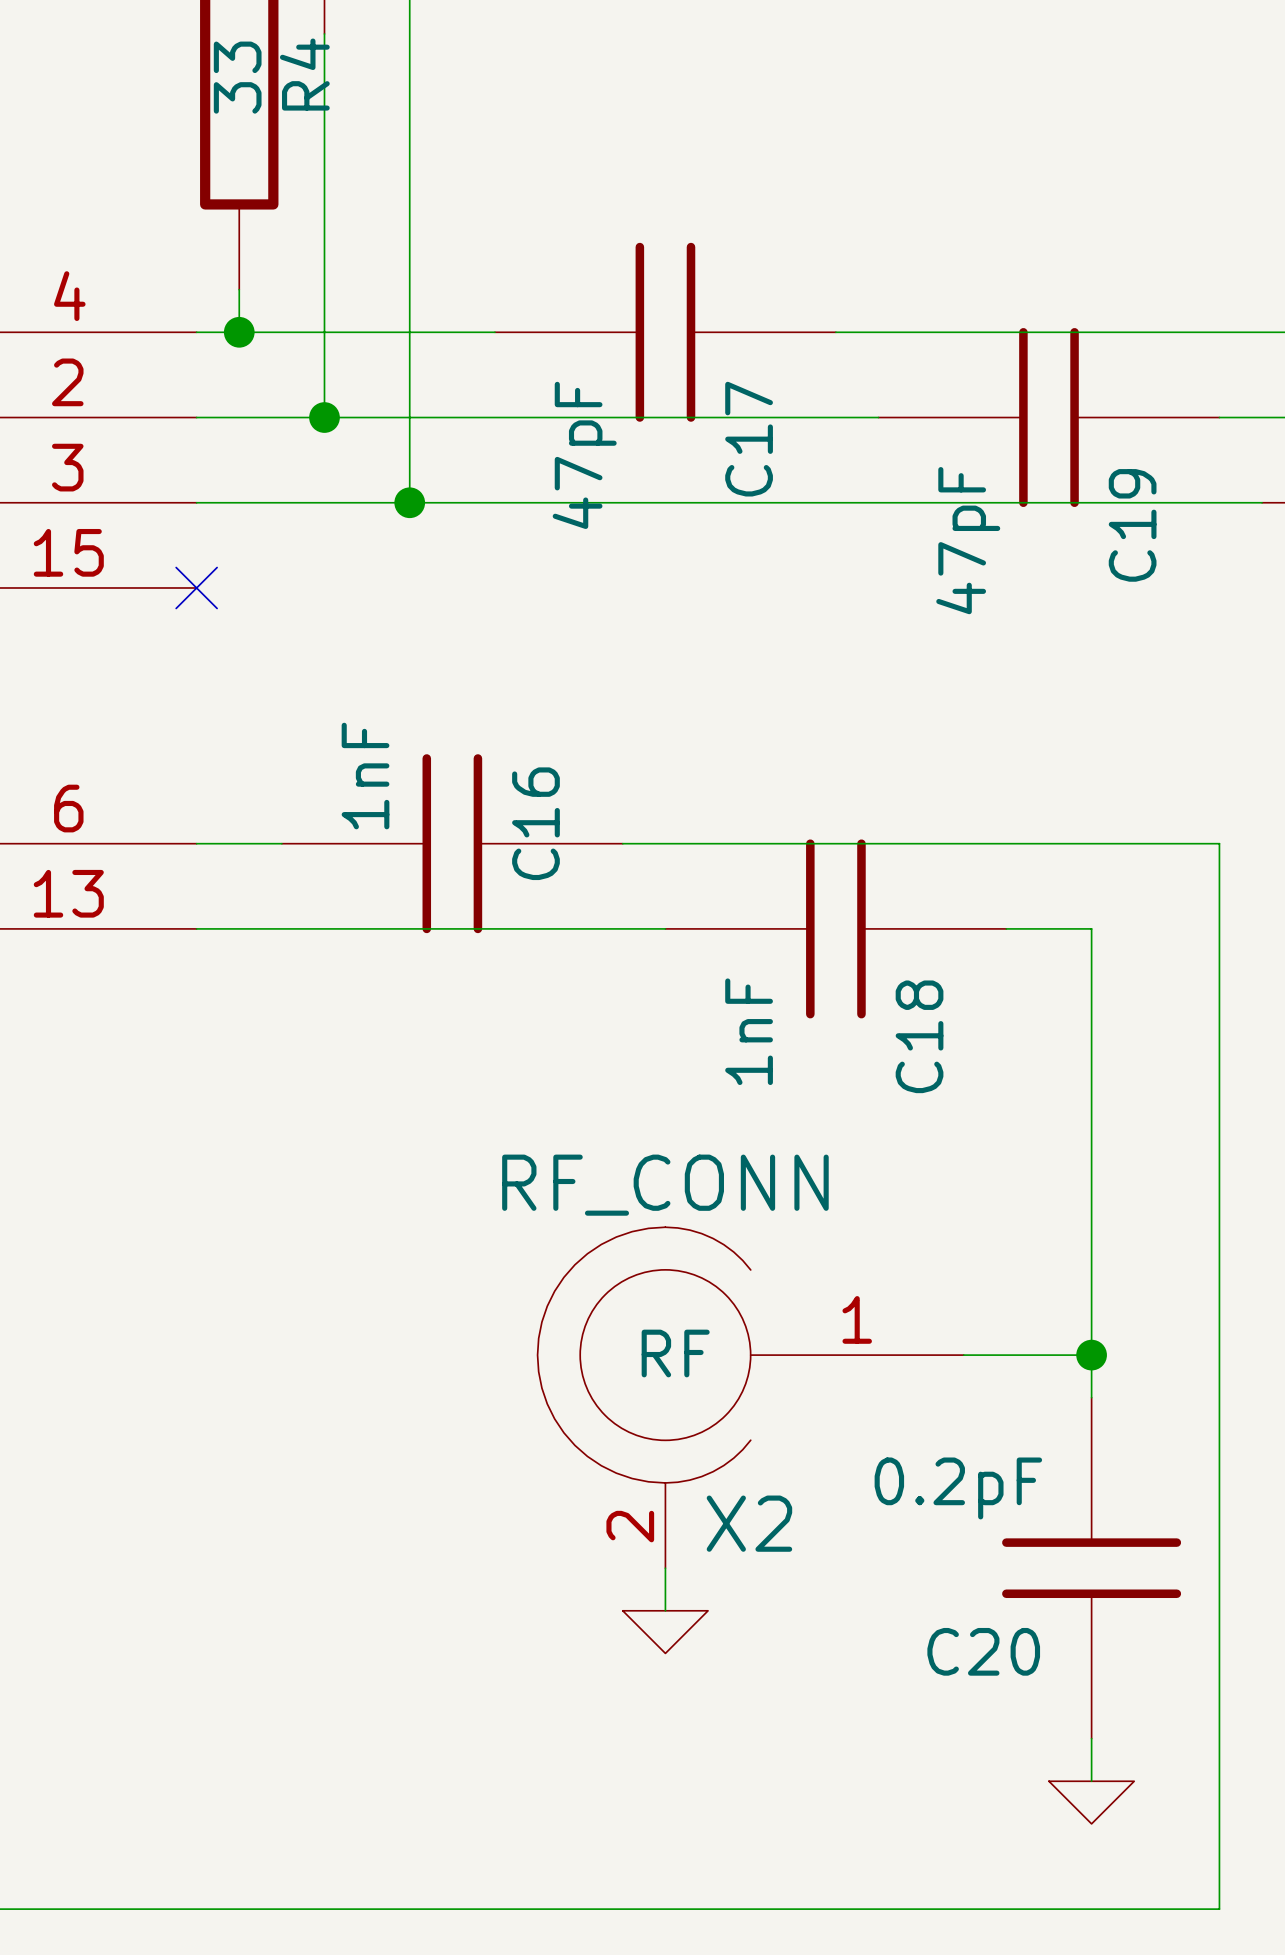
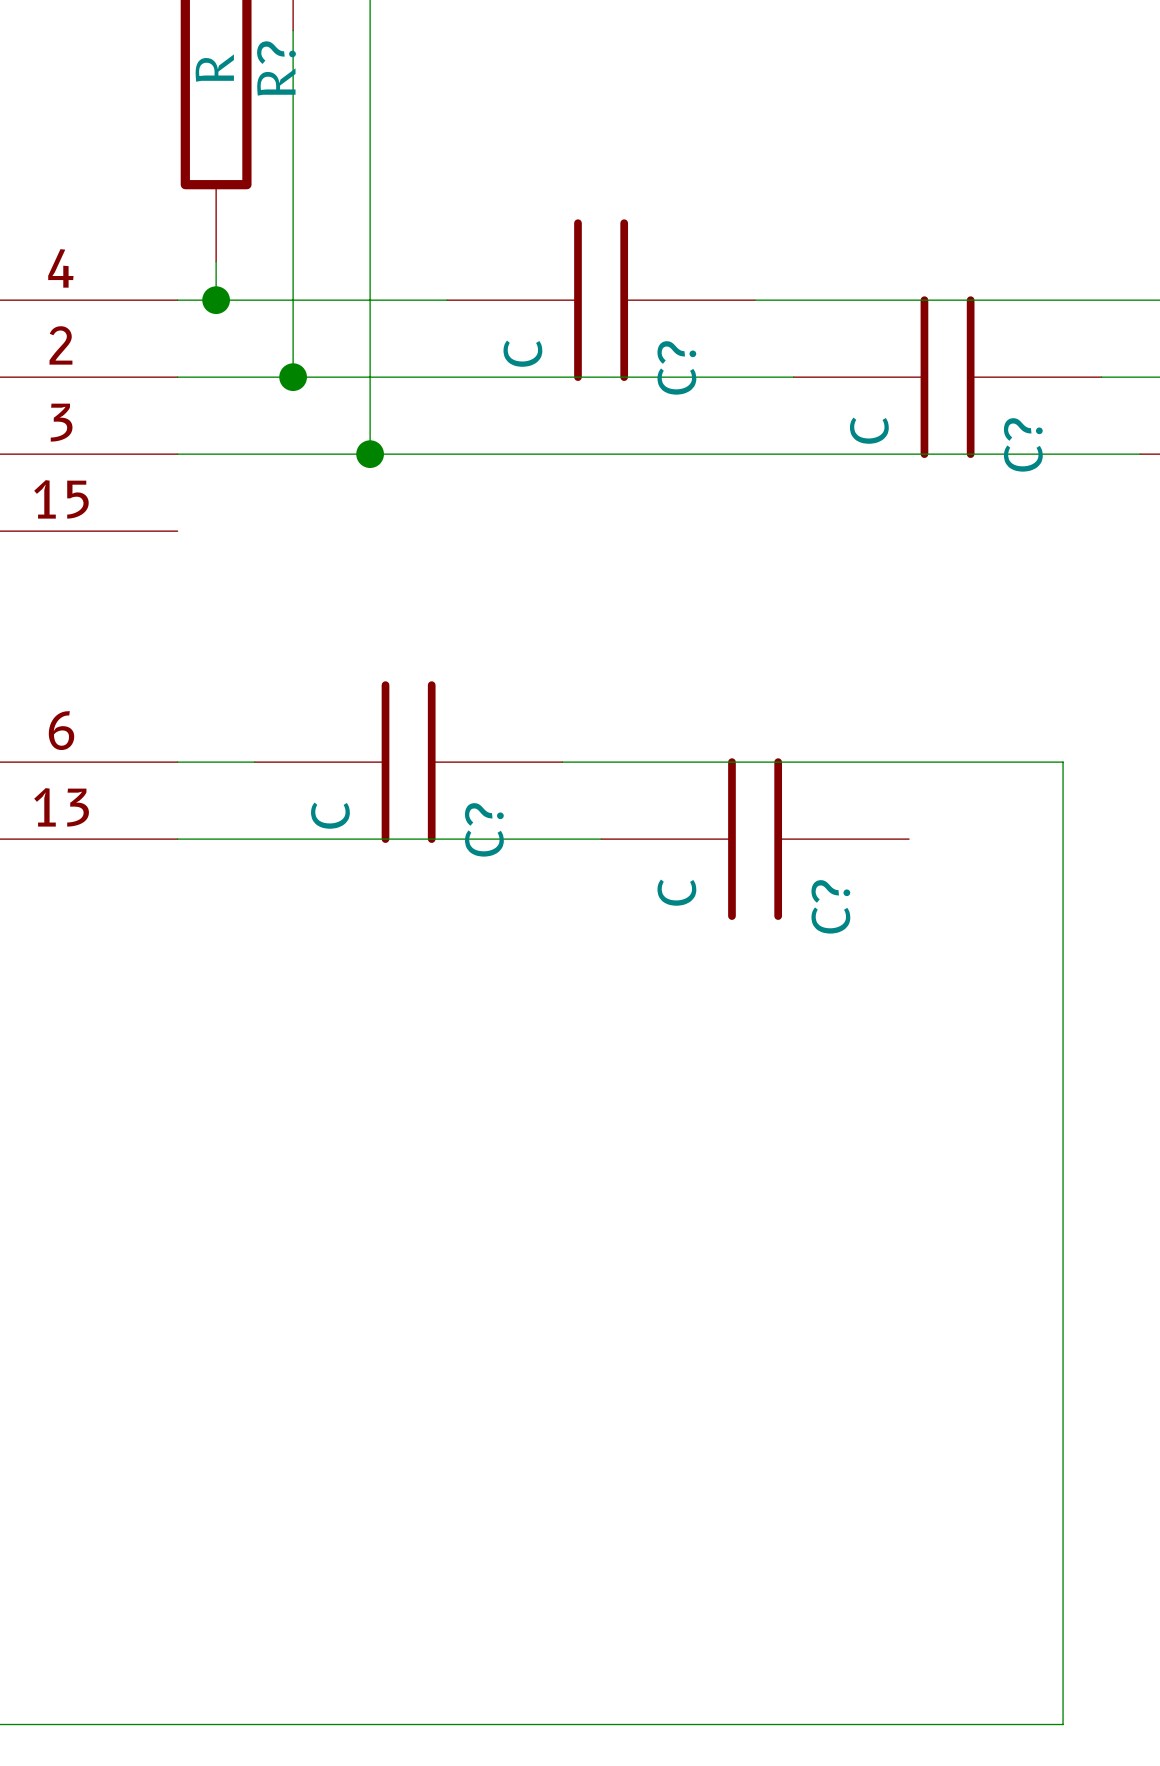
R4 name: R4 (304, 74) -> R? (276, 68)
R4 value: 33 (237, 77) -> R (214, 68)
C17 name: C17 (749, 439) -> C? (676, 367)
C17 value: 47pF (584, 455) -> C (522, 353)
C19 name: C19 (1132, 525) -> C? (1023, 444)
C19 value: 47pF (968, 540) -> C (869, 430)
no-connect mark: (196, 587) -> none
C16 value: 1nF (365, 776) -> C (330, 815)
C16 name: C16 (535, 823) -> C? (484, 829)
wire: (1176, 843) (1219, 843) (1219, 1909) (1176, 1909) -> (1063, 762) (1063, 1724)
wire: (1006, 928) (1091, 928) (1091, 1397) -> none
C18 value: 1nF (749, 1031) -> C (676, 892)
C18 name: C18 (919, 1036) -> C? (830, 906)
wire: (963, 1355) (1091, 1355) -> none
junction: (1091, 1355) -> none
X2: RF_CONN (750, 1397) -> none
wire: (665, 1568) (665, 1610) -> none
C20: 0.2pF (1091, 1568) -> none
power symbol: (665, 1632) -> none
wire: (1091, 1738) (1091, 1781) -> none
power symbol: (1091, 1802) -> none

